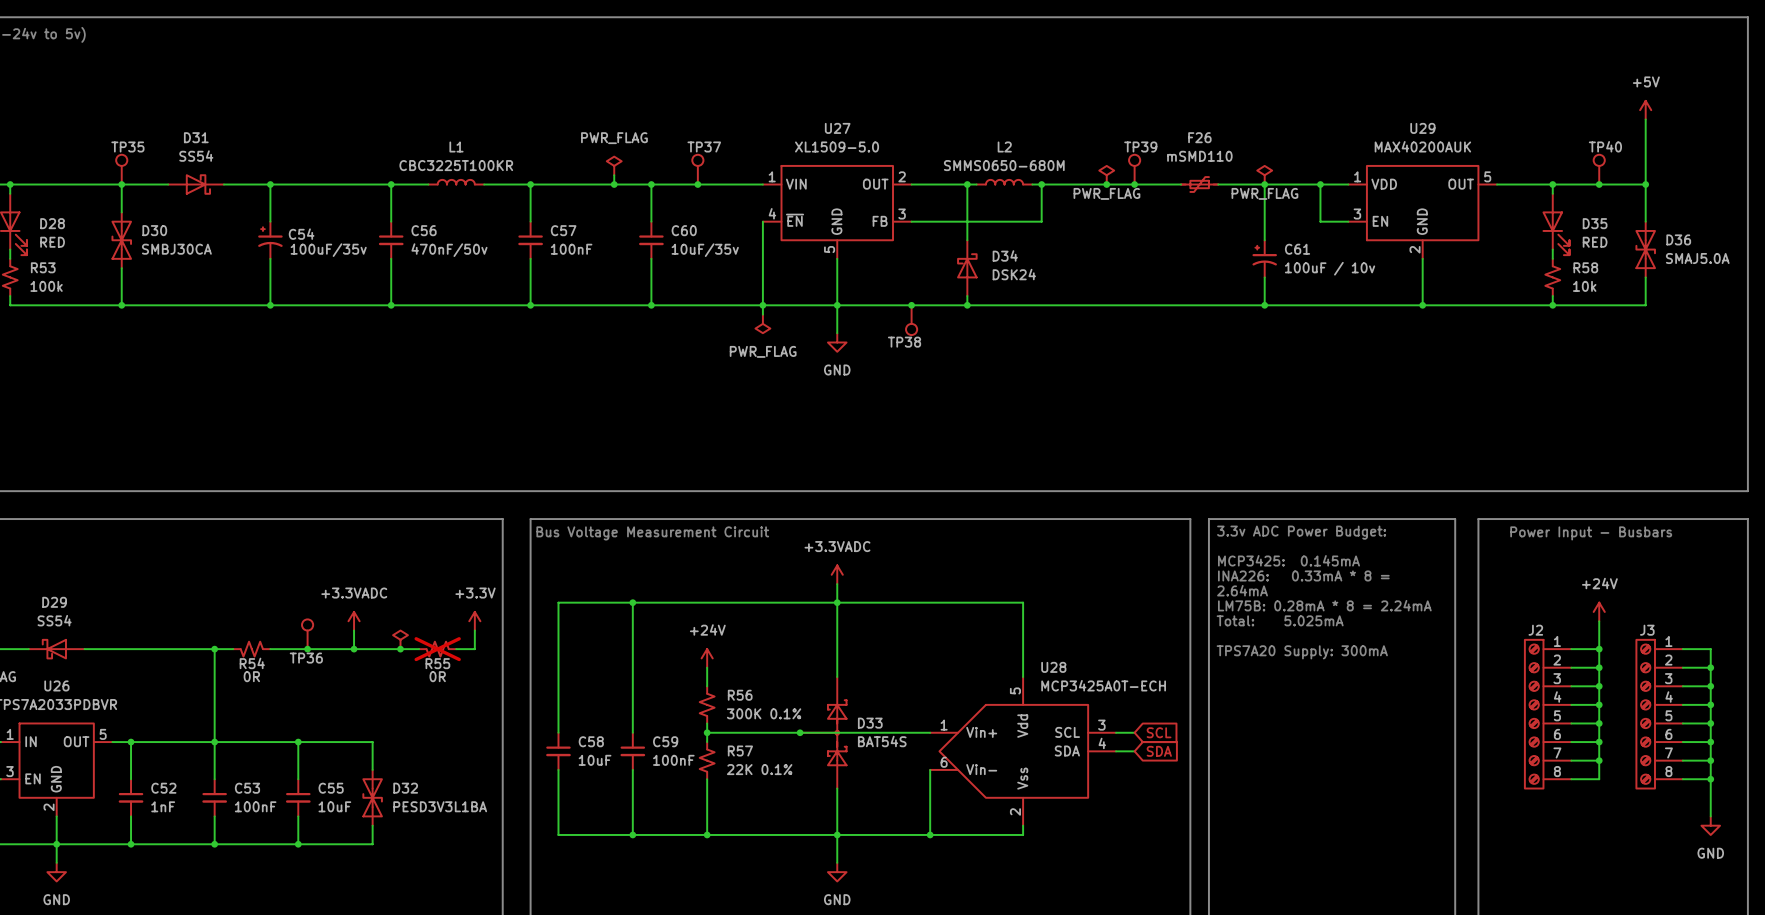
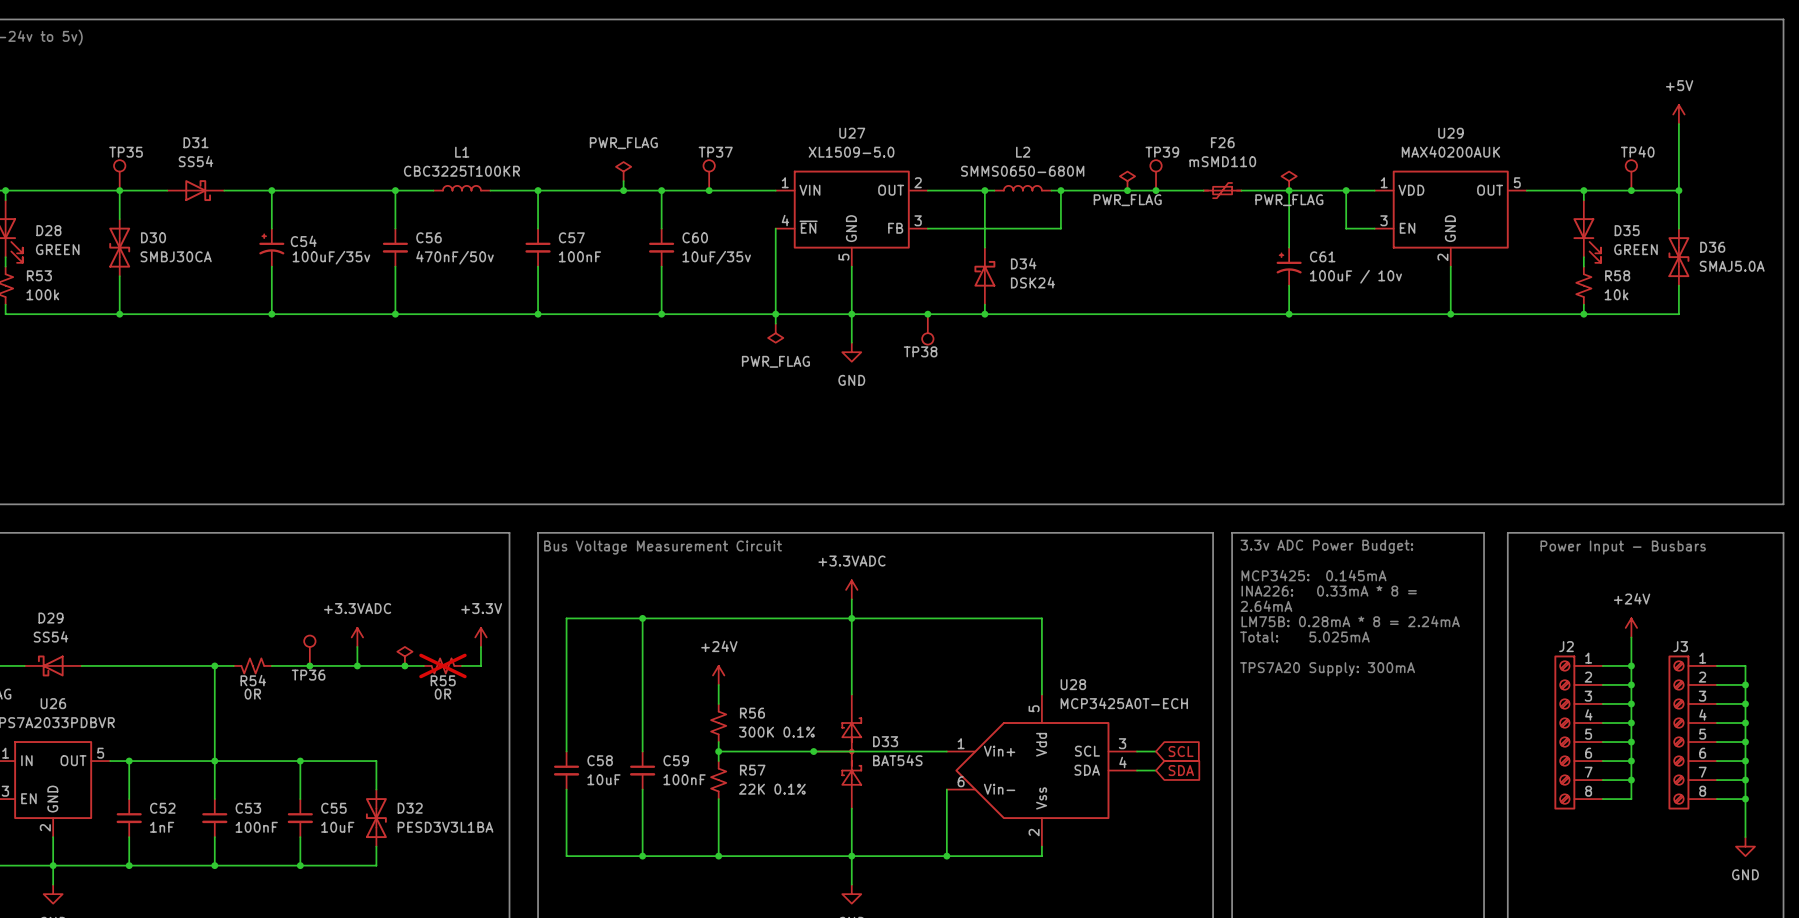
D28 value: RED (52, 242) -> GREEN (57, 249)
D35 value: RED (1595, 242) -> GREEN (1635, 249)

